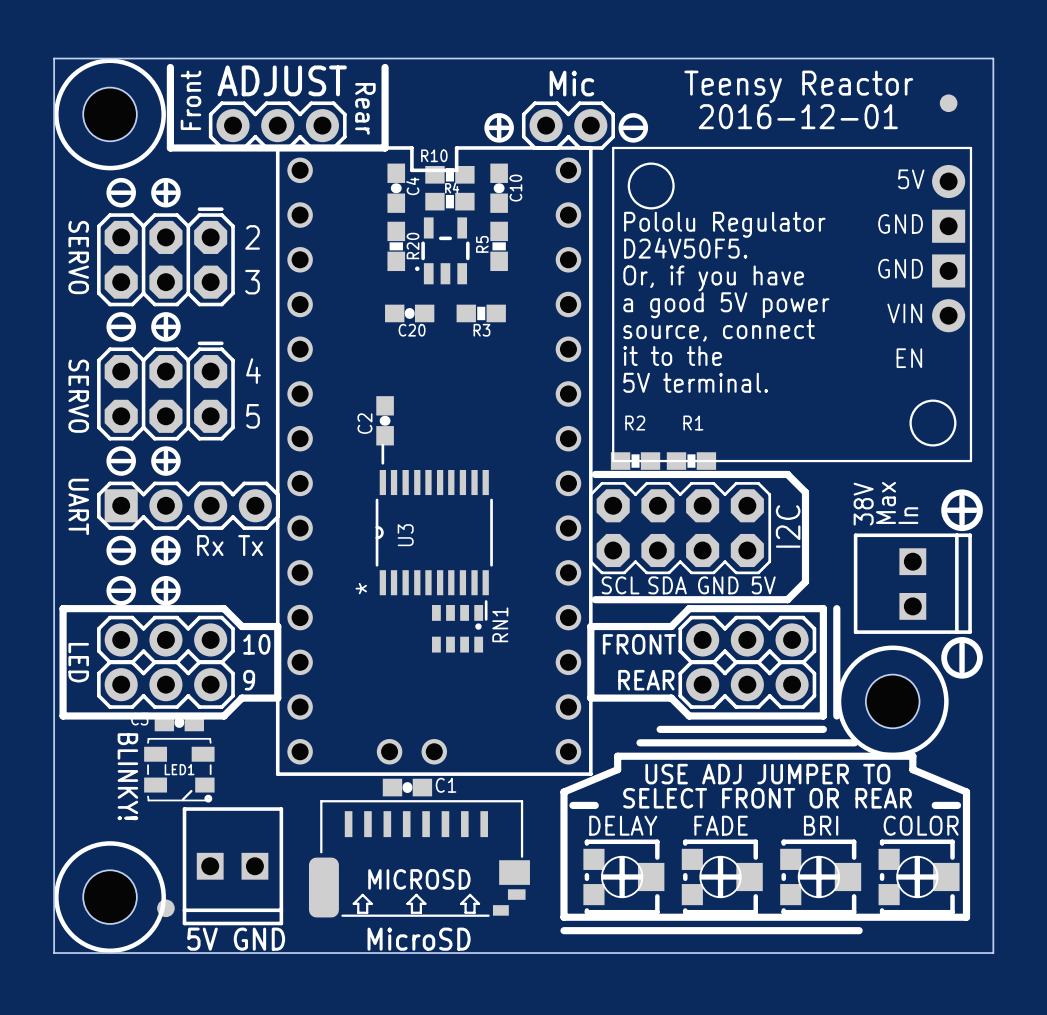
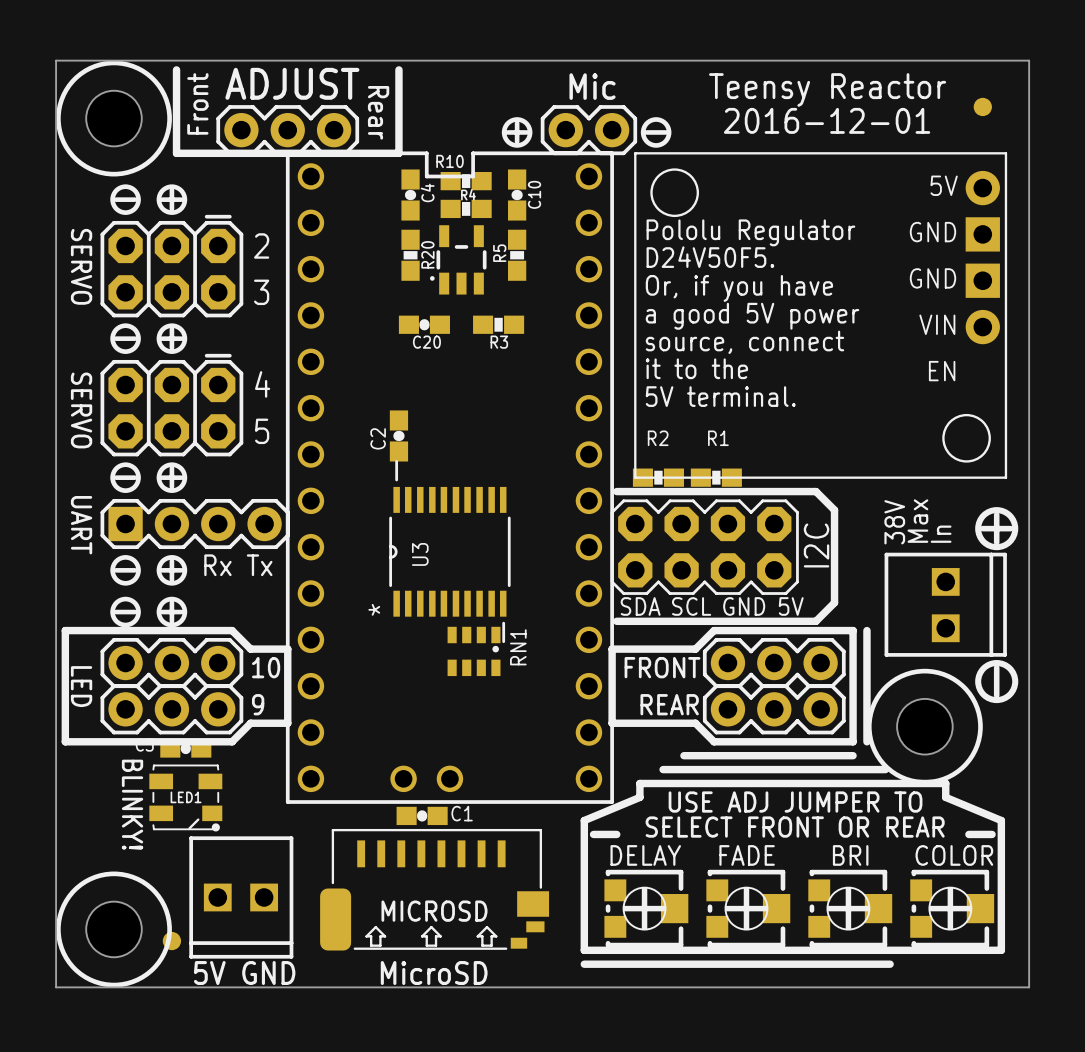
text: SCL (620, 585) -> SDA (640, 606)
text: SDA (667, 585) -> SCL (691, 606)

